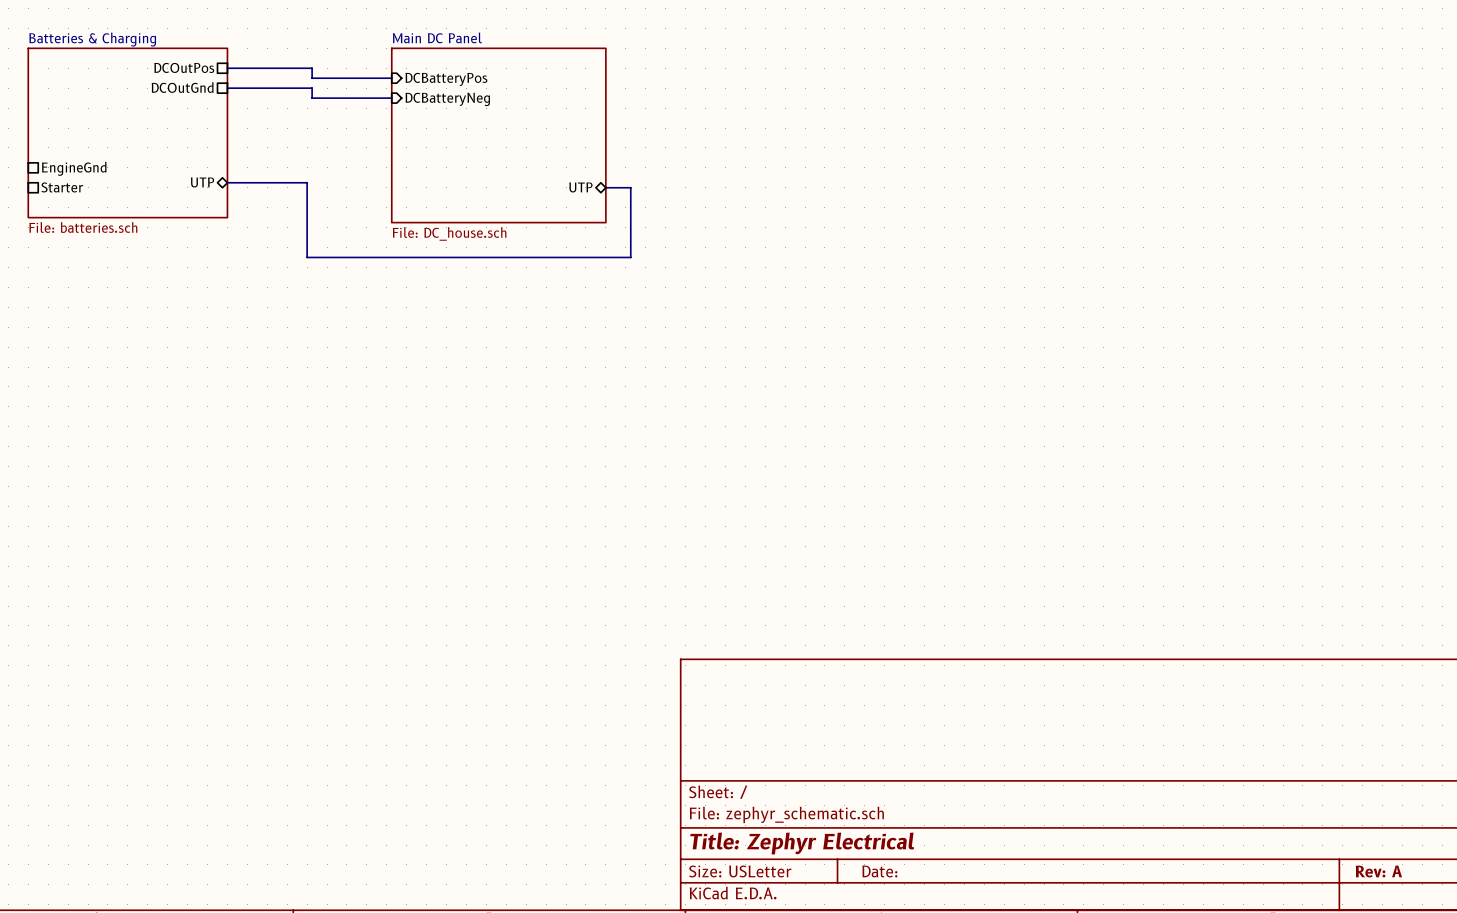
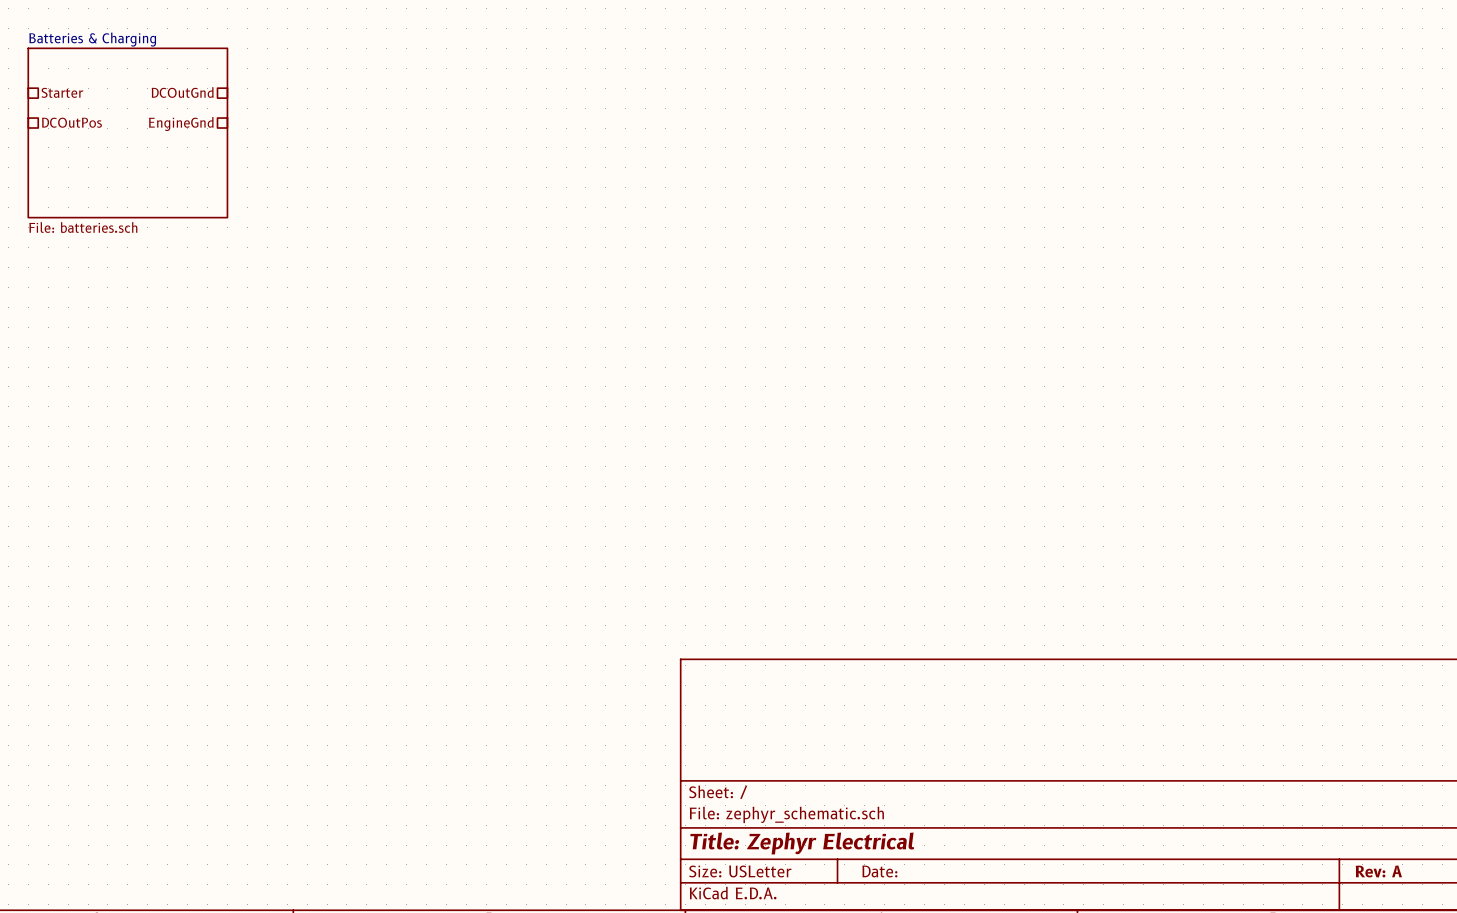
sheet pin: DCOutPos (184, 67) -> none
wire: (227, 68) (312, 68) (312, 78) (391, 78) -> none
sheet pin: DCBatteryPos (446, 79) -> none
sheet pin: DCOutGnd (182, 87) -> none
wire: (227, 88) (312, 88) (312, 98) (391, 98) -> none
hierarchical label: none -> Starter (62, 92)
hierarchical label: none -> DCOutGnd (182, 92)
sheet pin: DCBatteryNeg (447, 99) -> none
hierarchical label: none -> DCOutPos (71, 122)
hierarchical label: none -> EngineGnd (181, 124)
sheet Main DC Panel: File: DC_house.sch (498, 135) -> none
sheet pin: EngineGnd (74, 168) -> none
sheet pin: UTP (202, 182) -> none
wire: (227, 182) (307, 182) (307, 257) (630, 257) (630, 187) (605, 187) -> none
sheet pin: Starter (62, 187) -> none
sheet pin: UTP (580, 187) -> none

